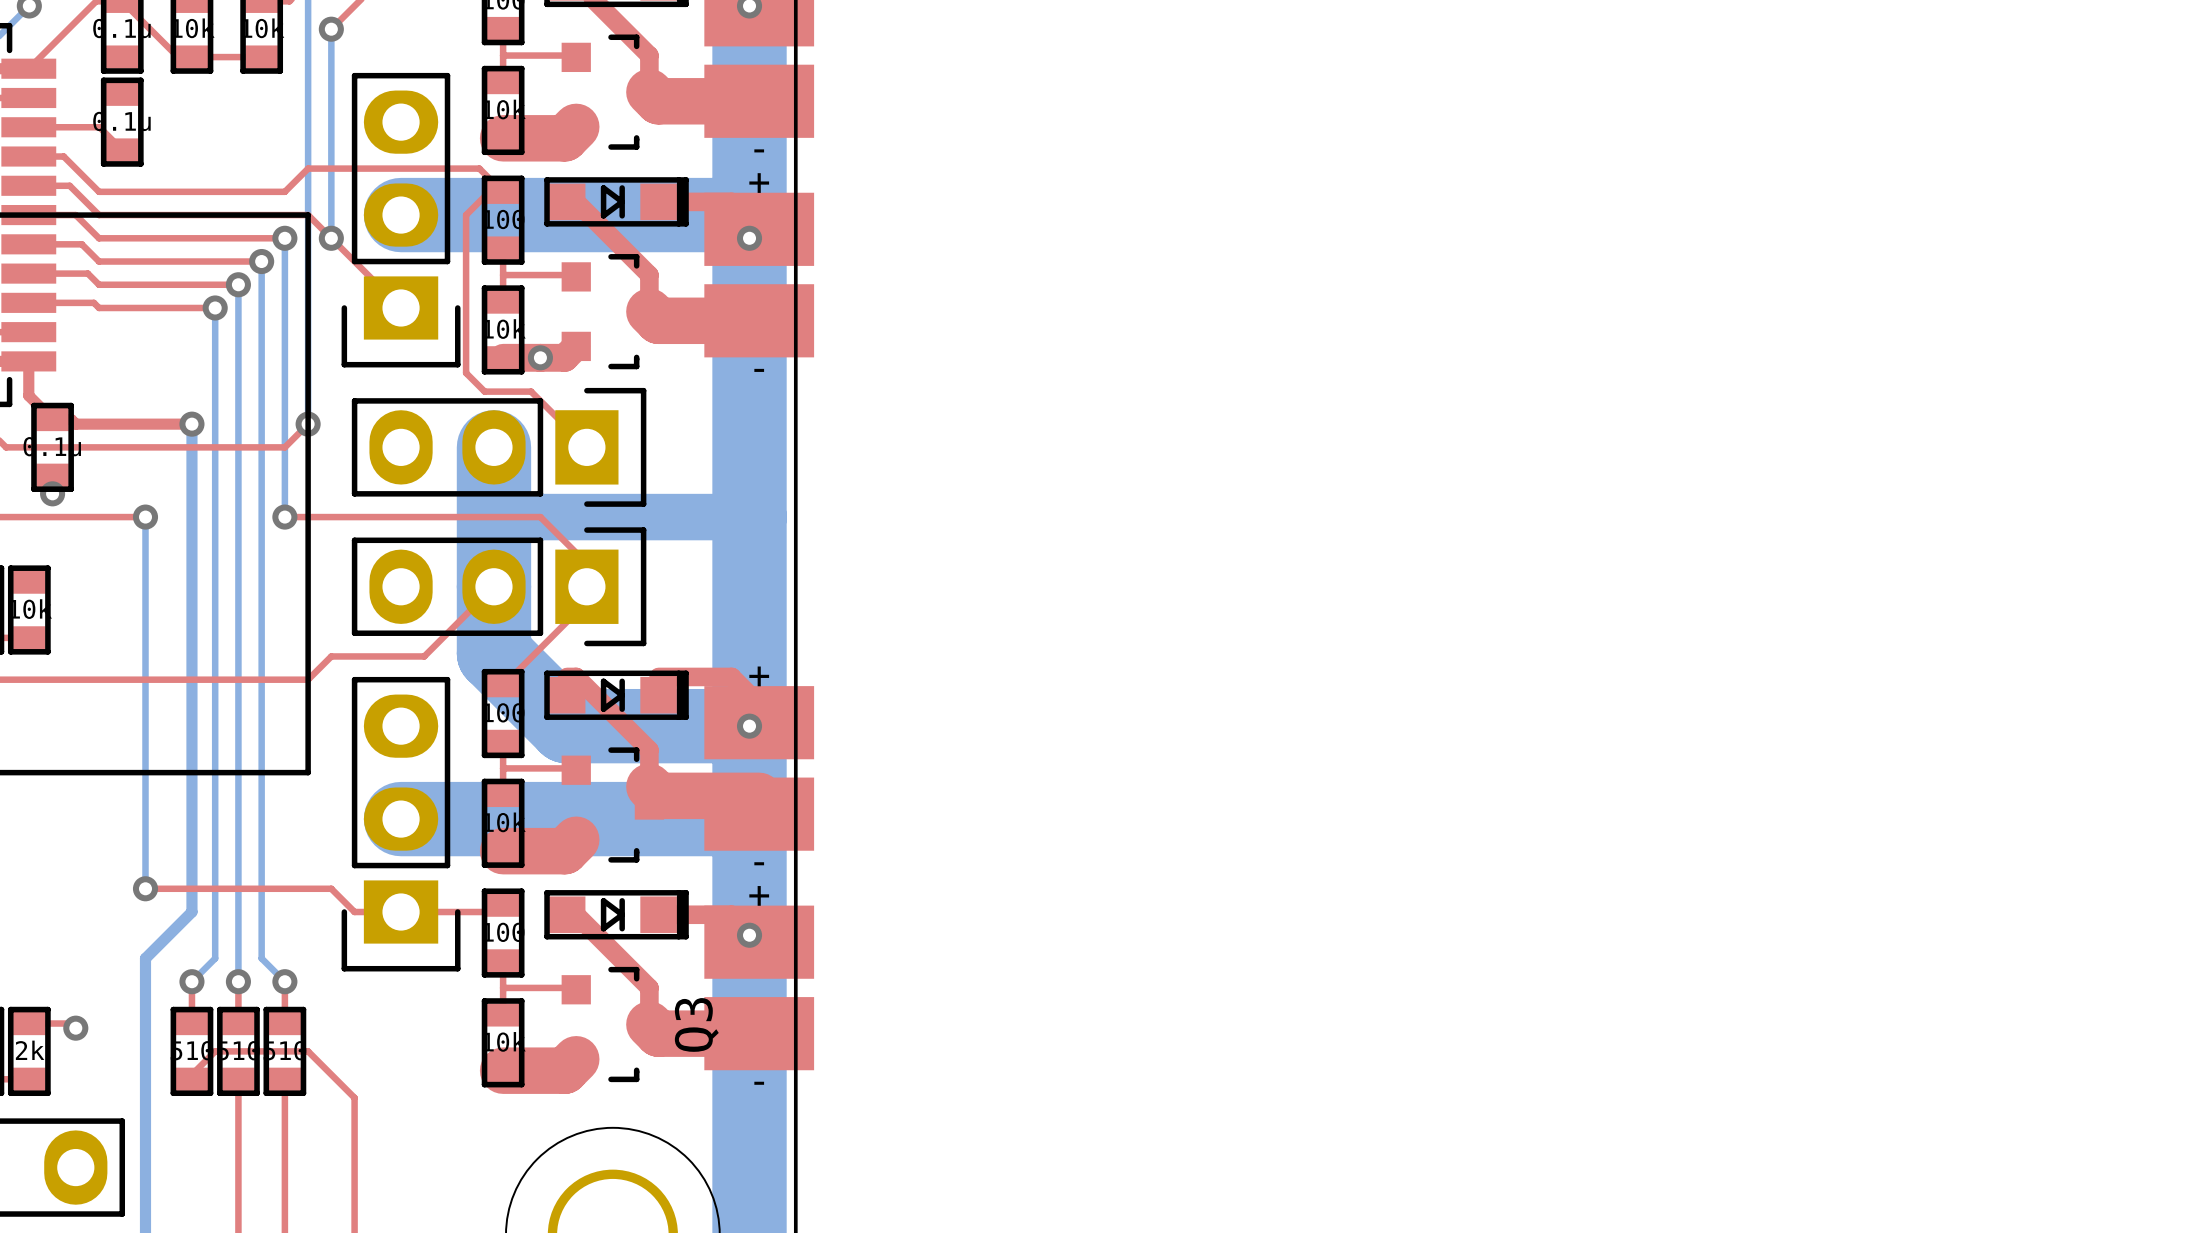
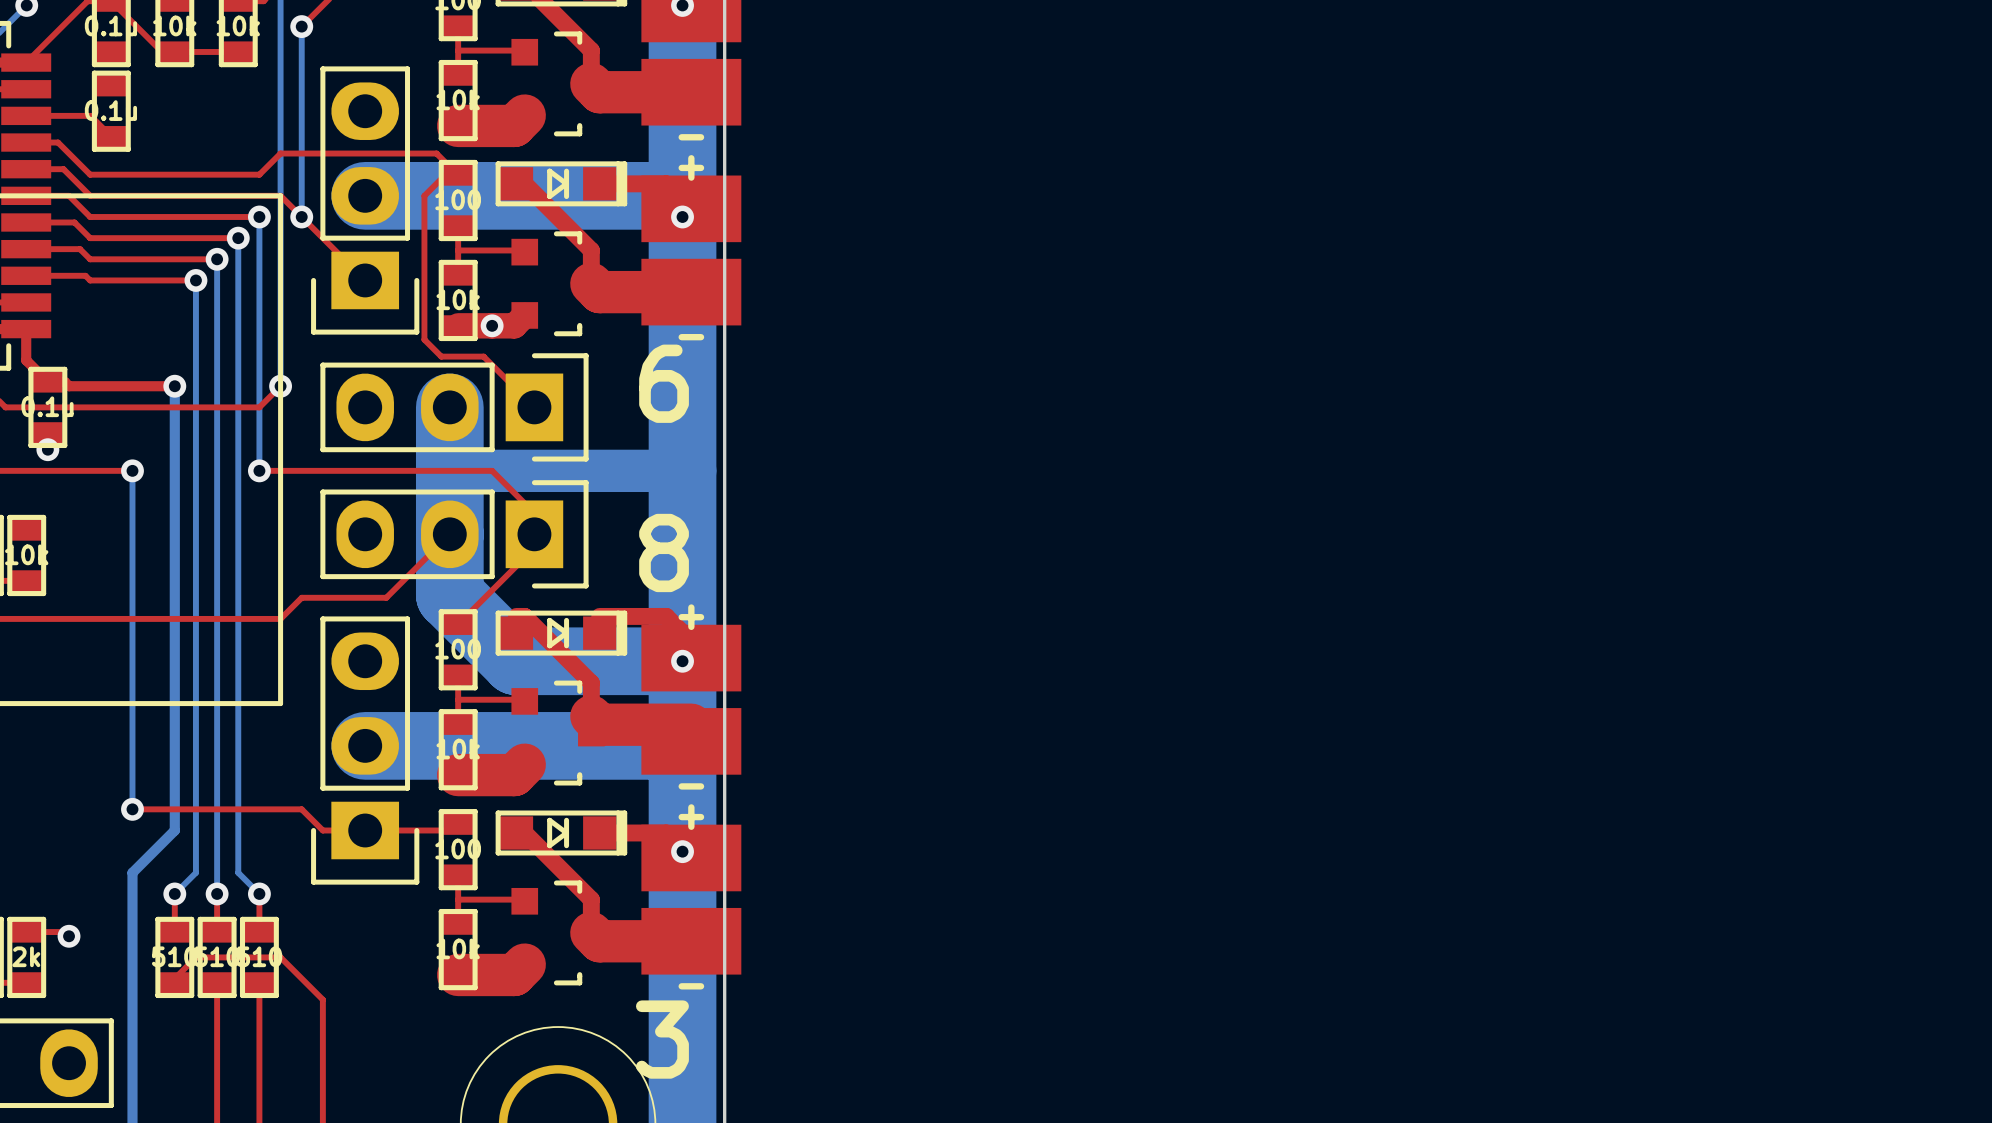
part text: none -> 6 (664, 383)
part text: none -> 8 (664, 552)
Q3 name: Q3 (696, 1024) -> none
part text: none -> 3 (662, 1039)

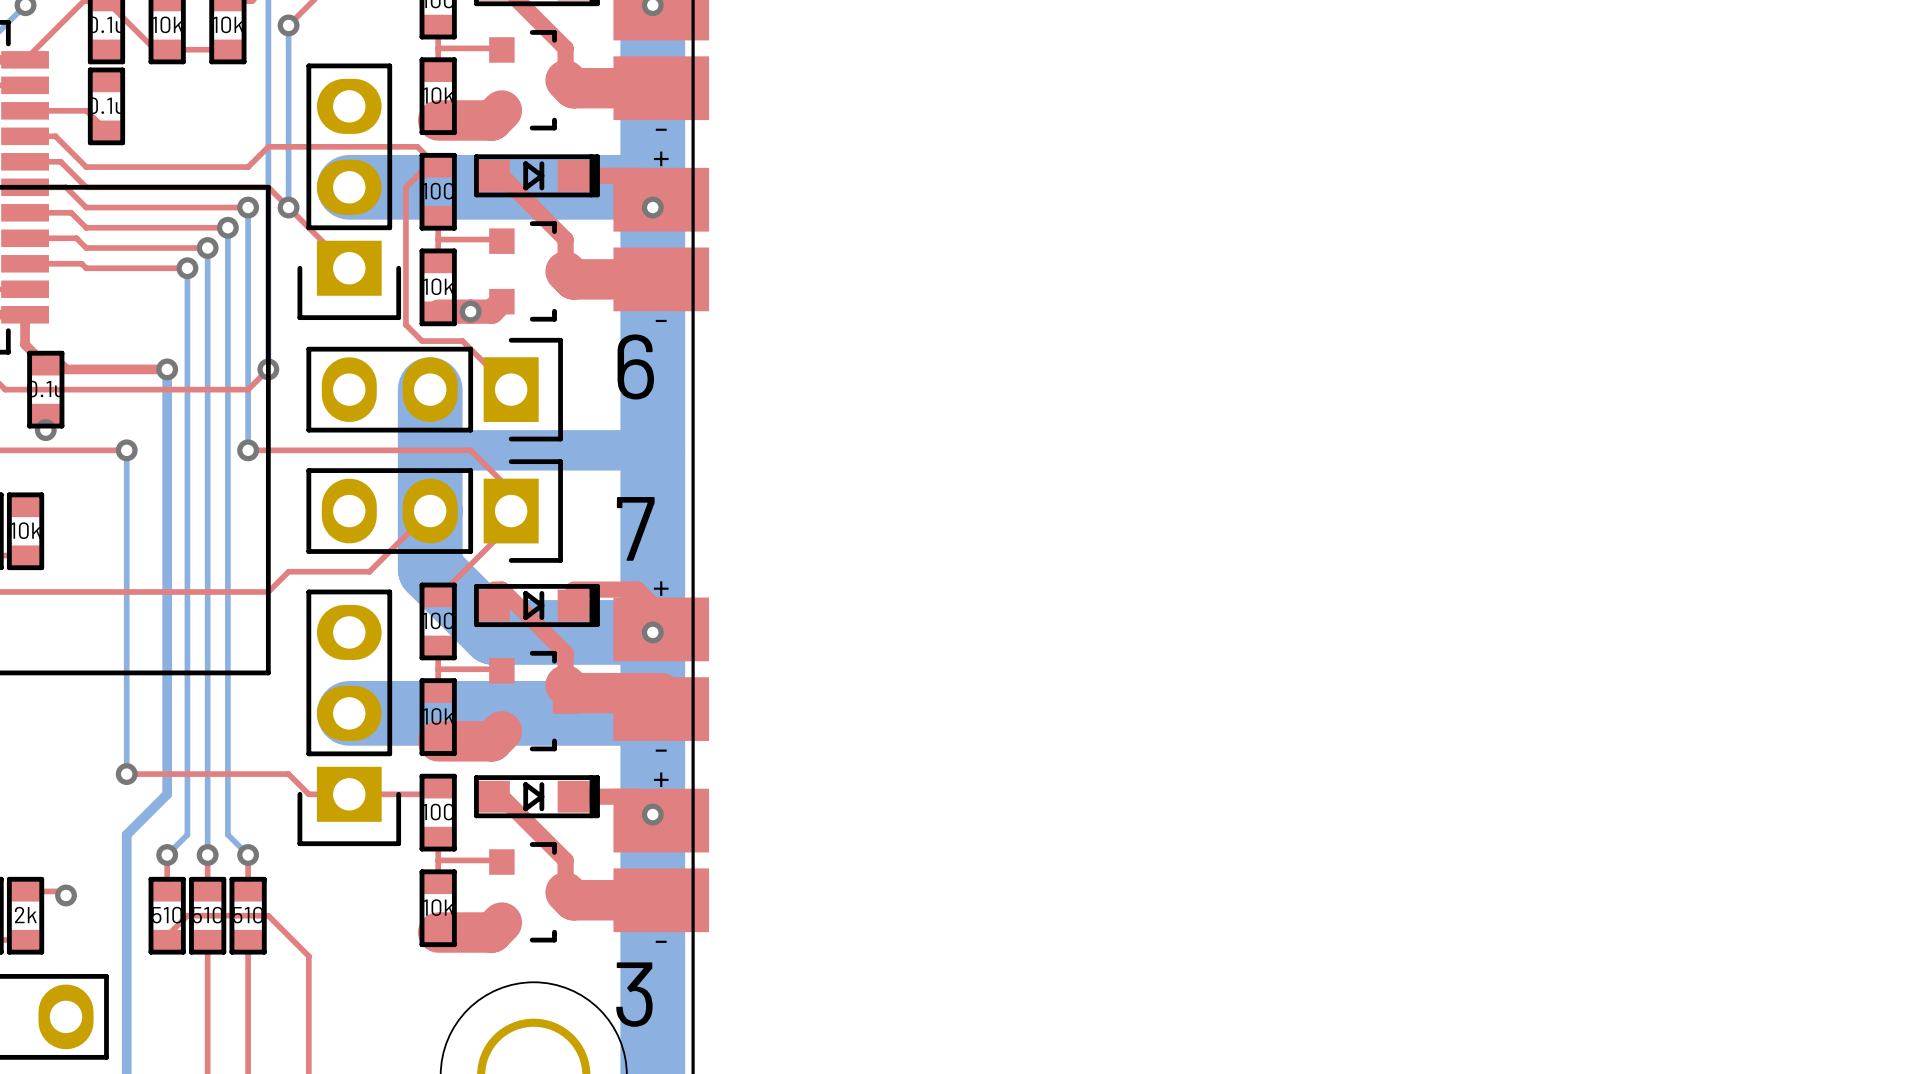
part text: 8 (664, 552) -> 7 (635, 528)

